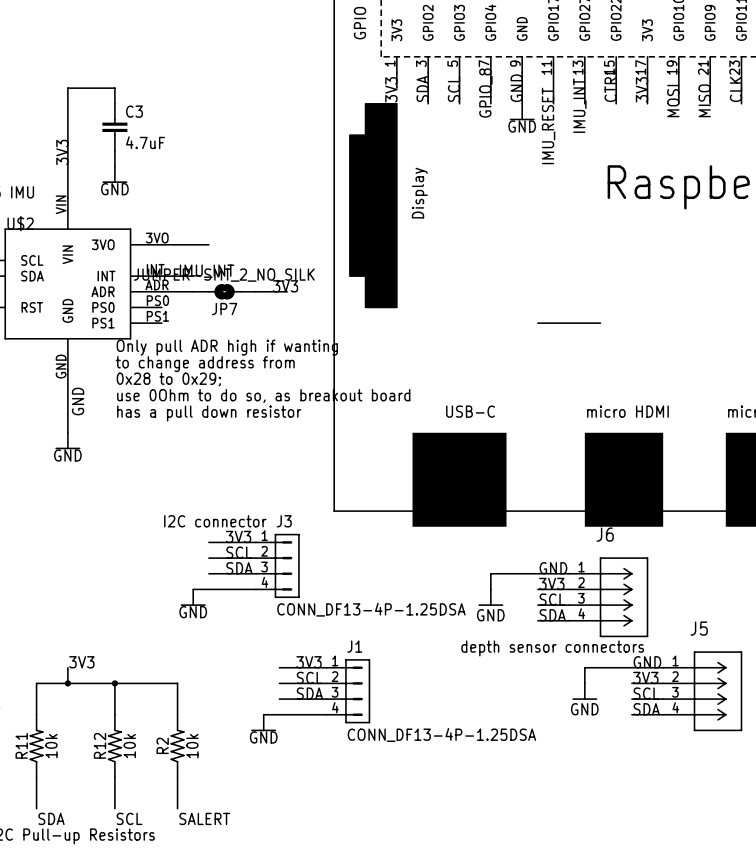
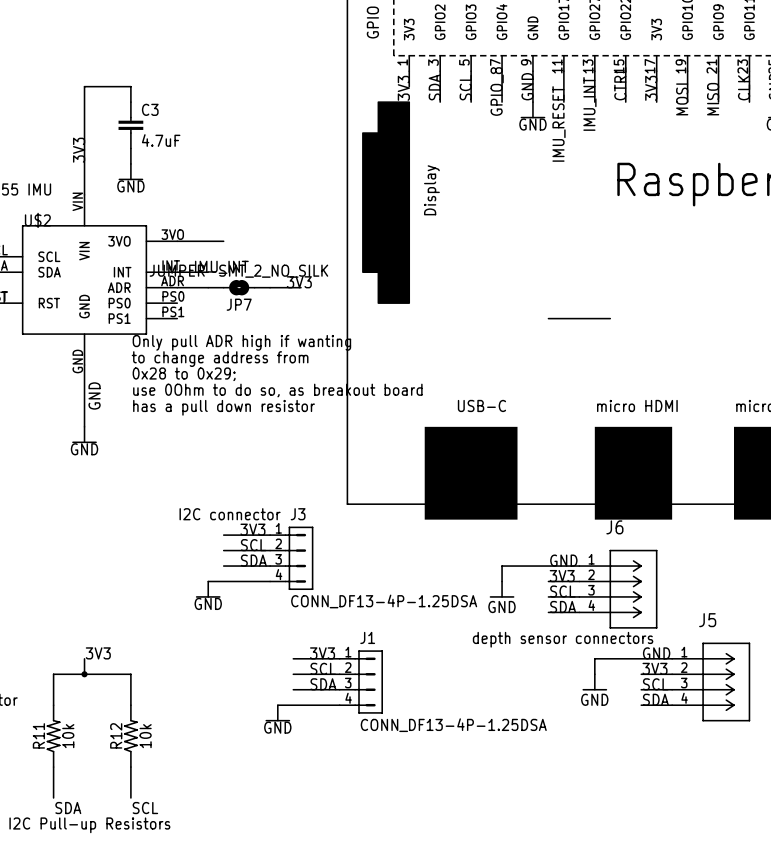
wire: (114, 683) (177, 683) (177, 714) -> none
junction: (114, 683) -> none
R2: 10k (177, 746) -> none
wire: (177, 777) (177, 808) -> none
label: SALERT (204, 818) -> none

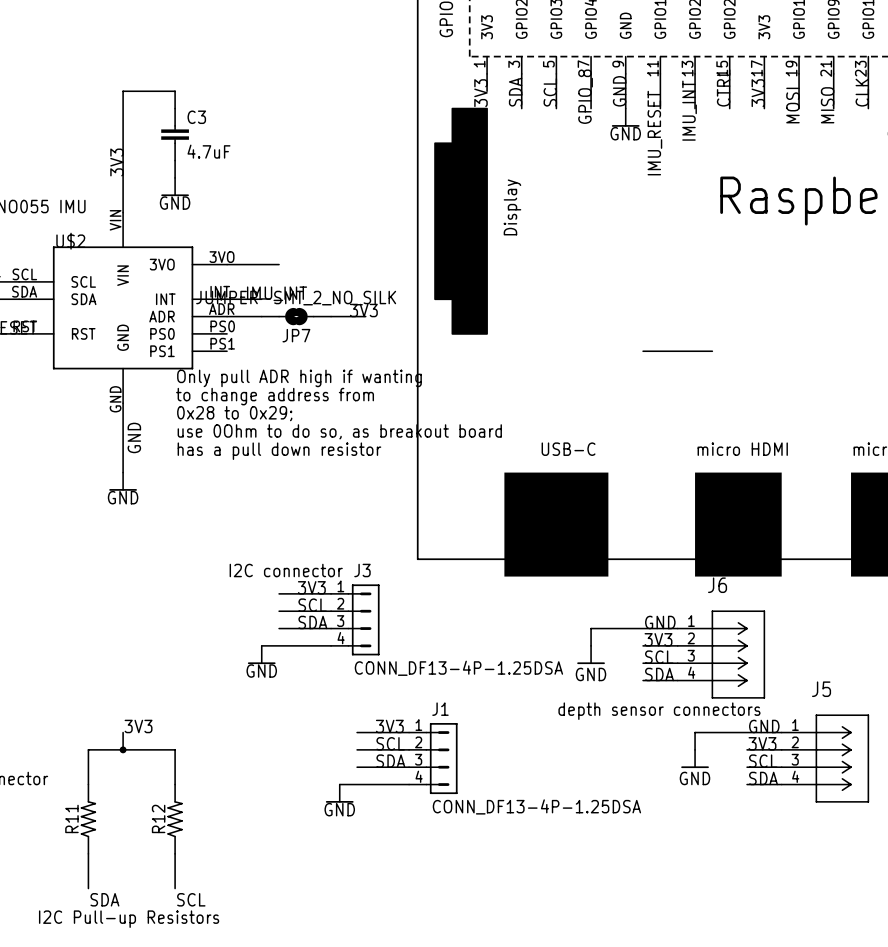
R11 value: 10k (68, 736) -> none
R12 value: 10k (145, 736) -> none

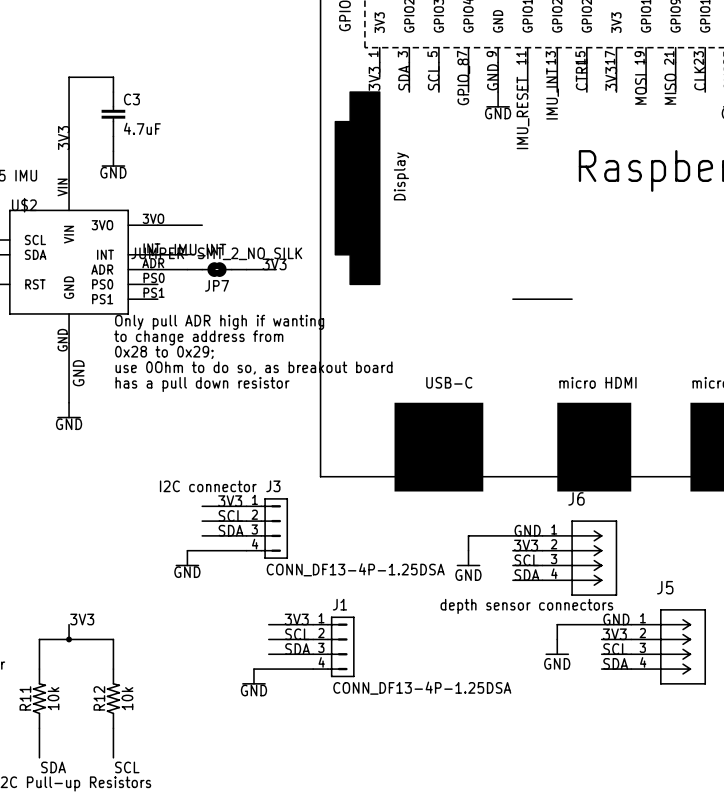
R11 value: none -> 10k (53, 698)
R12 value: none -> 10k (127, 698)

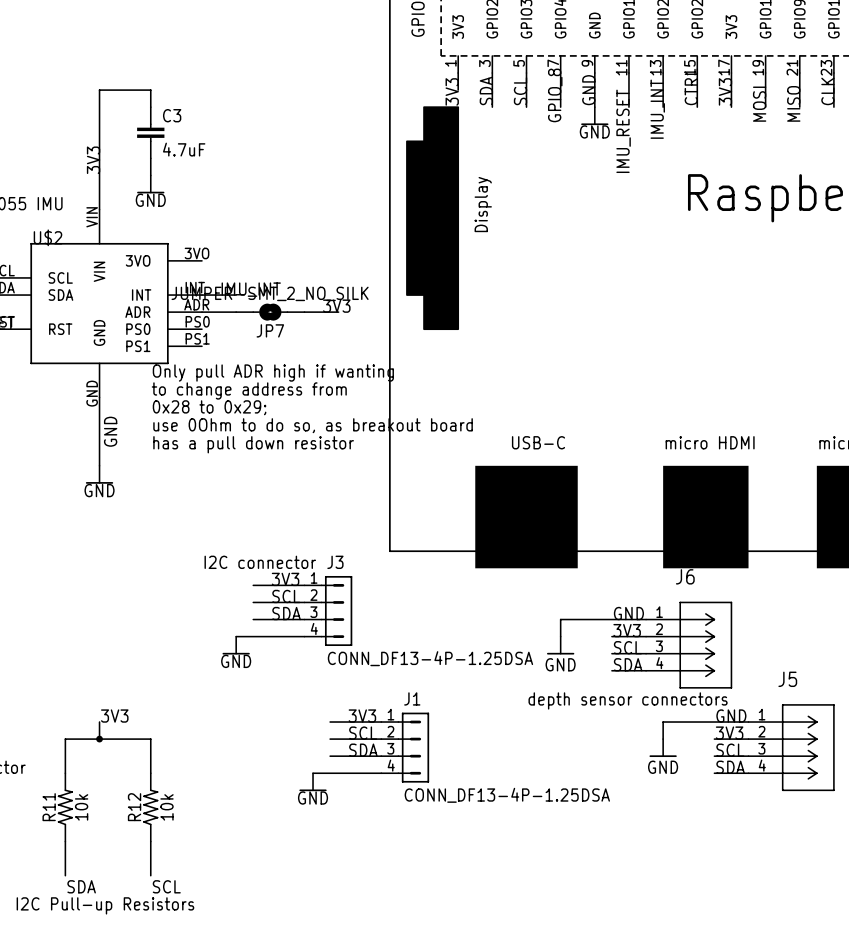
wire: (157, 225) (202, 225) -> none
wire: (512, 299) (572, 299) -> none

